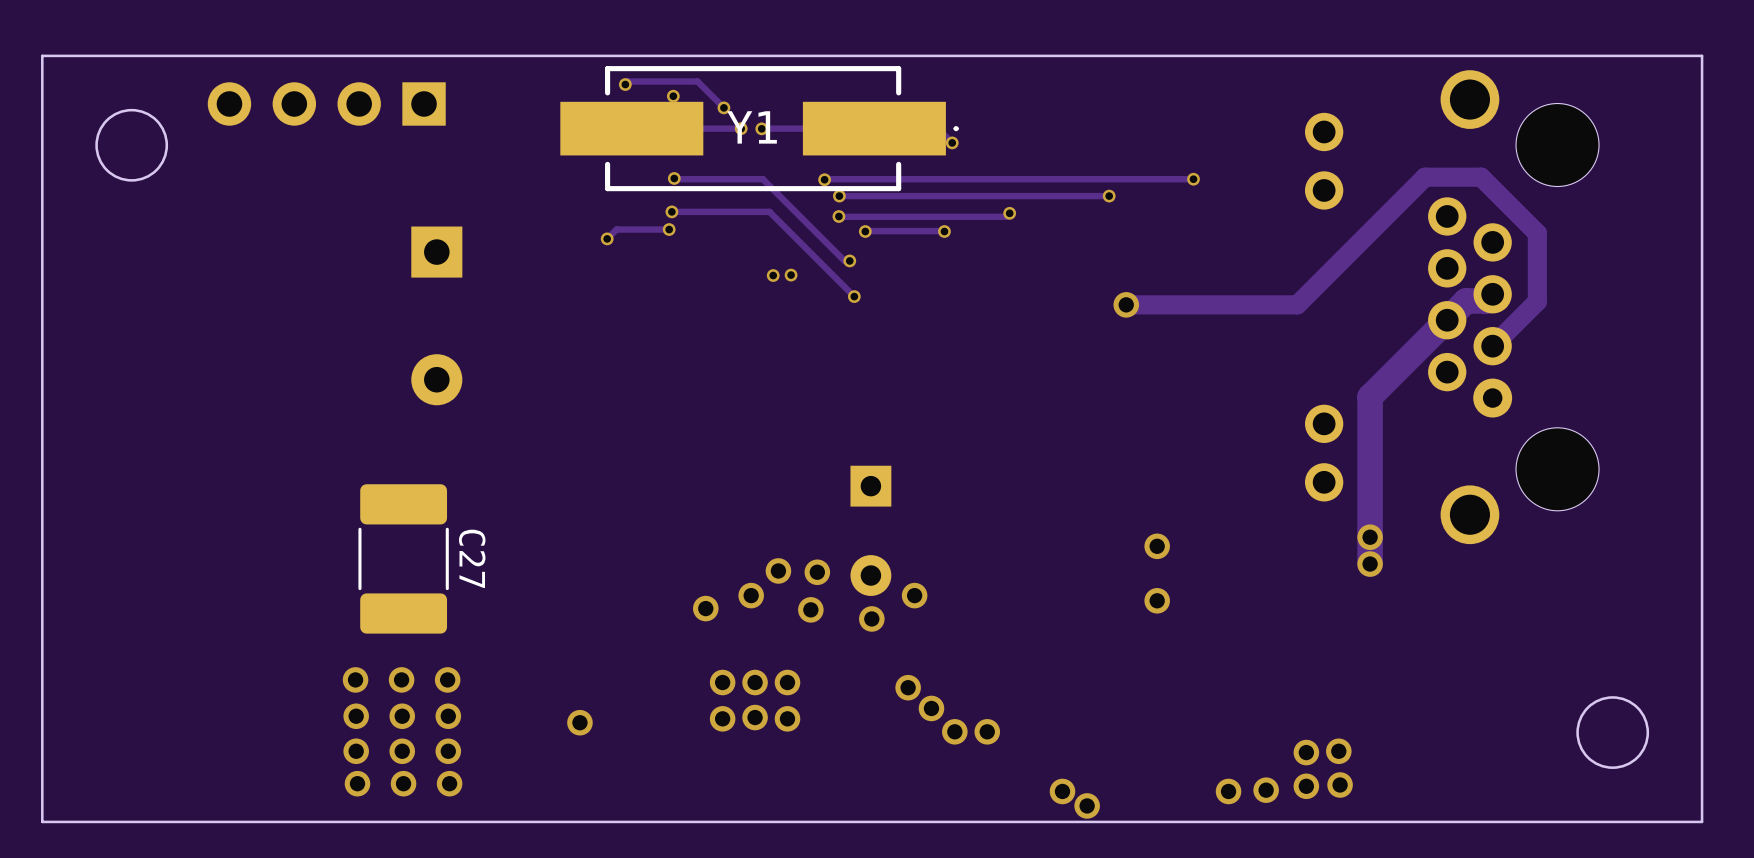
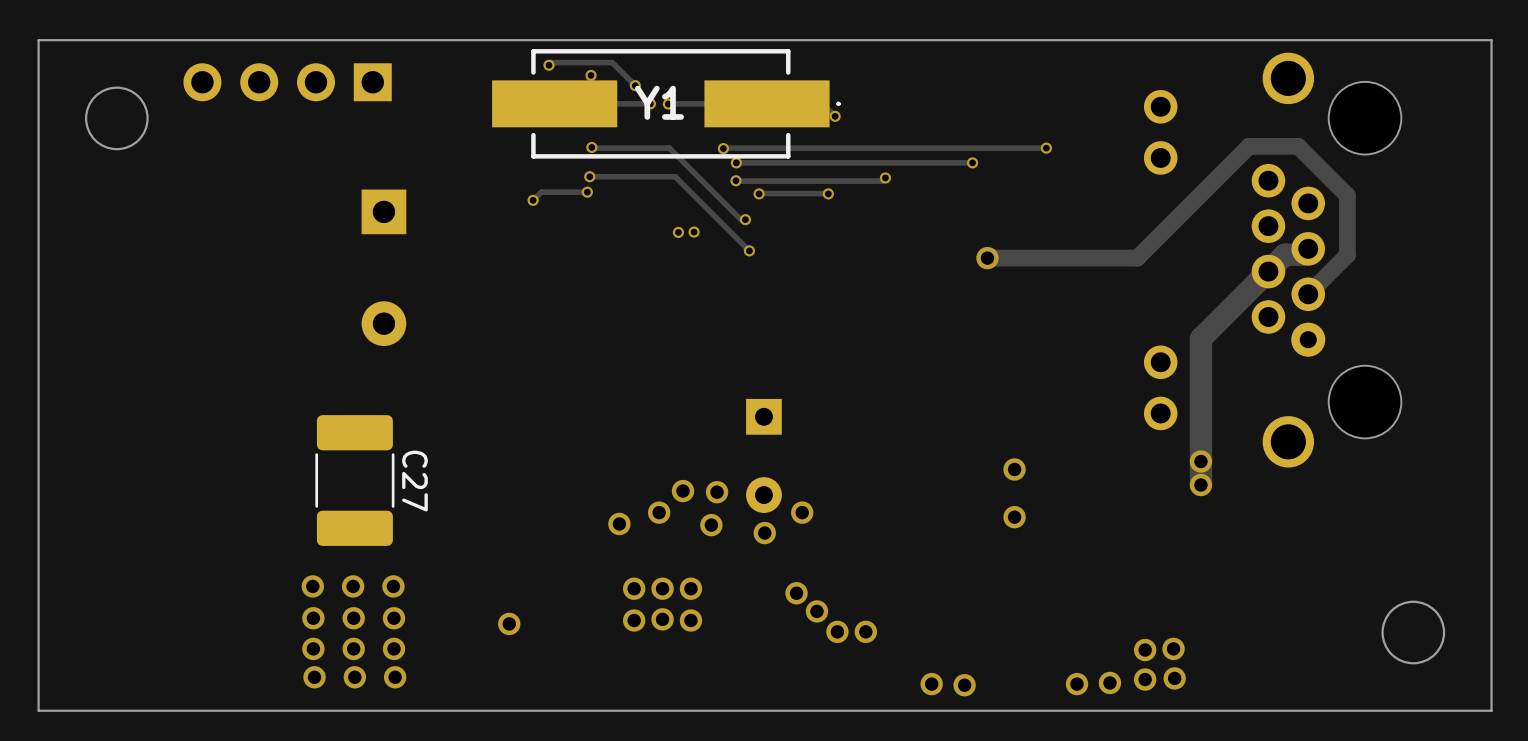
via position: (1087, 805) -> (964, 685)

